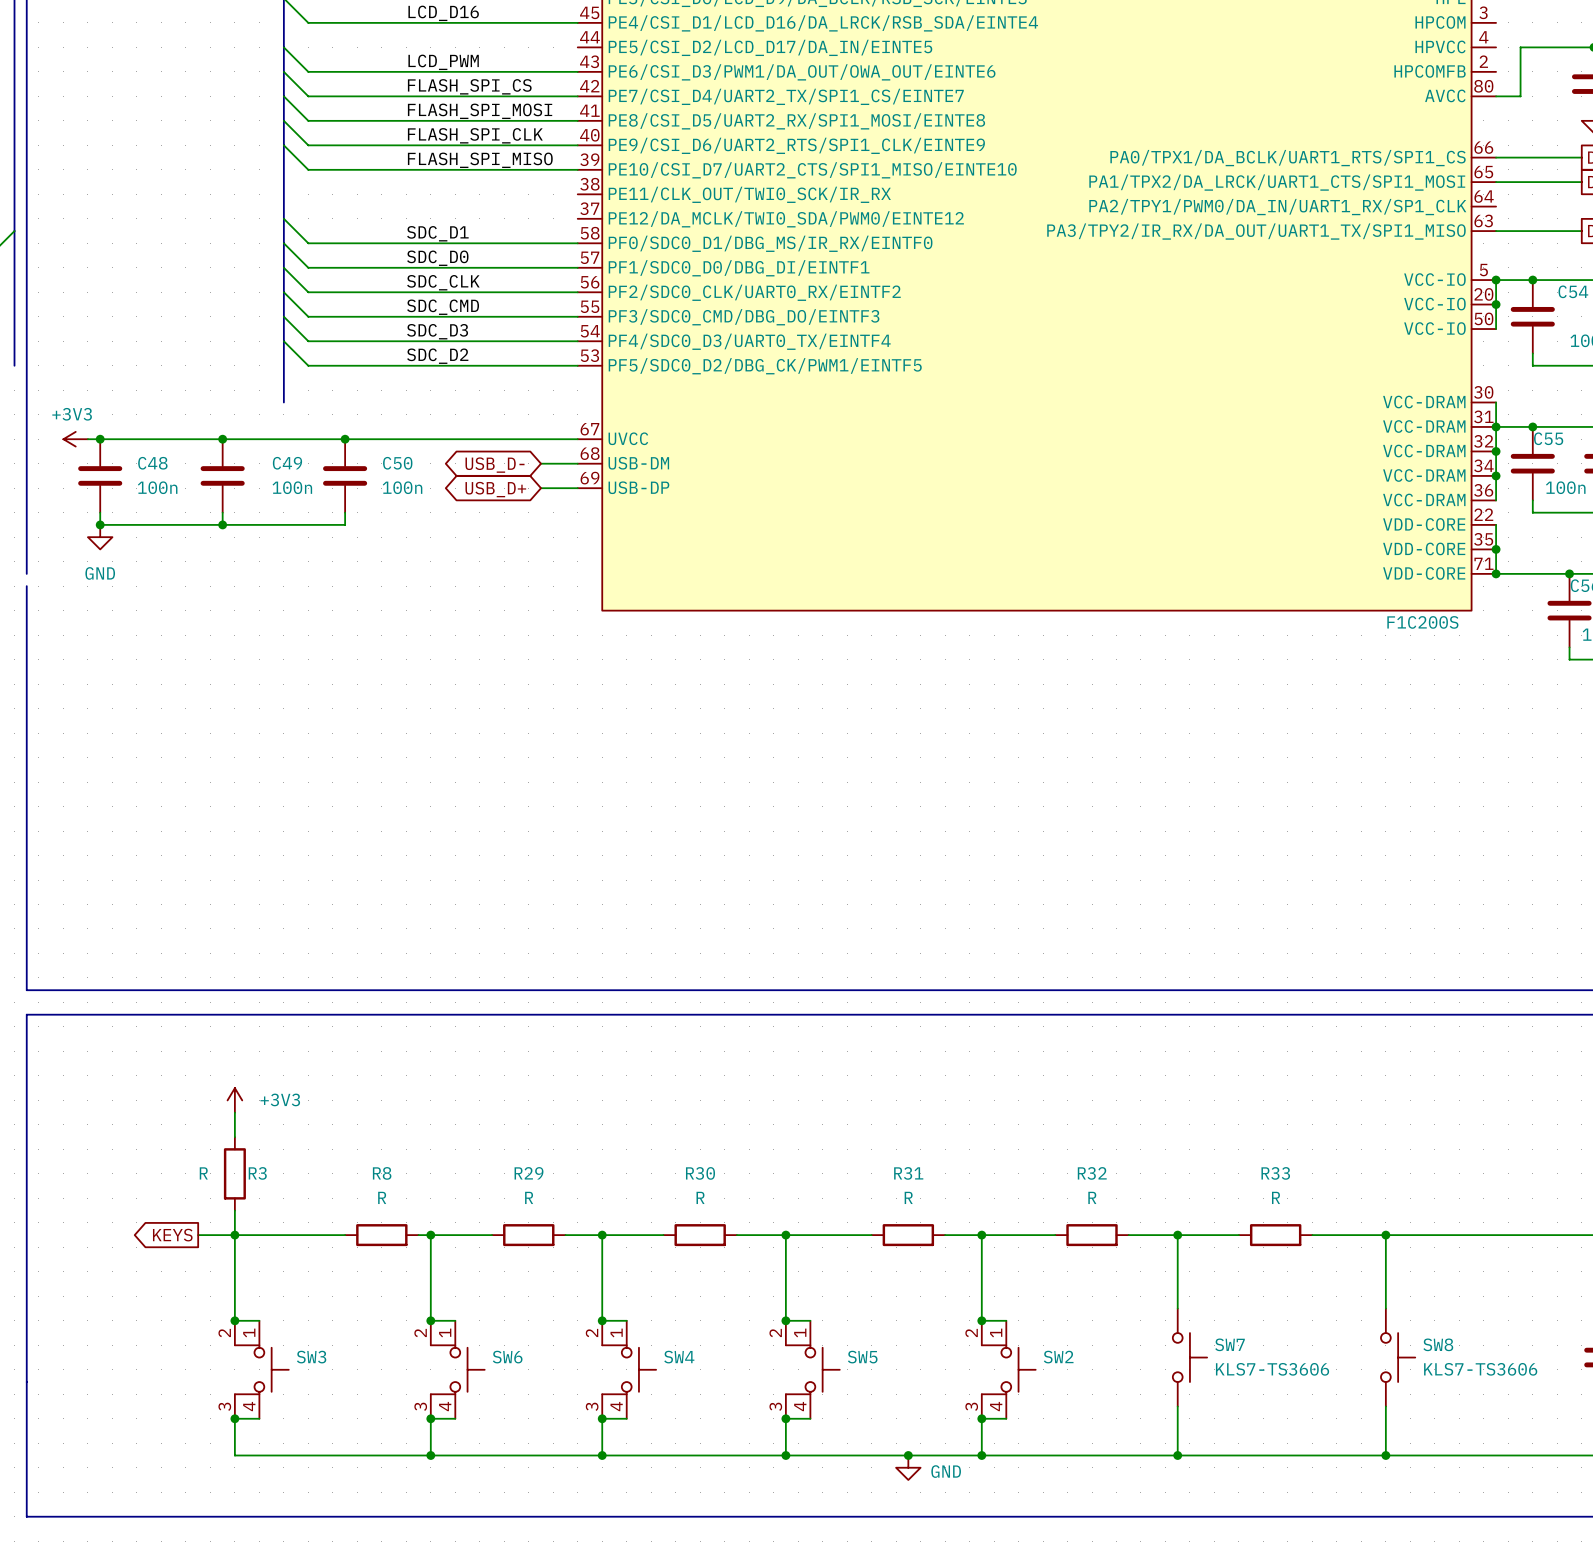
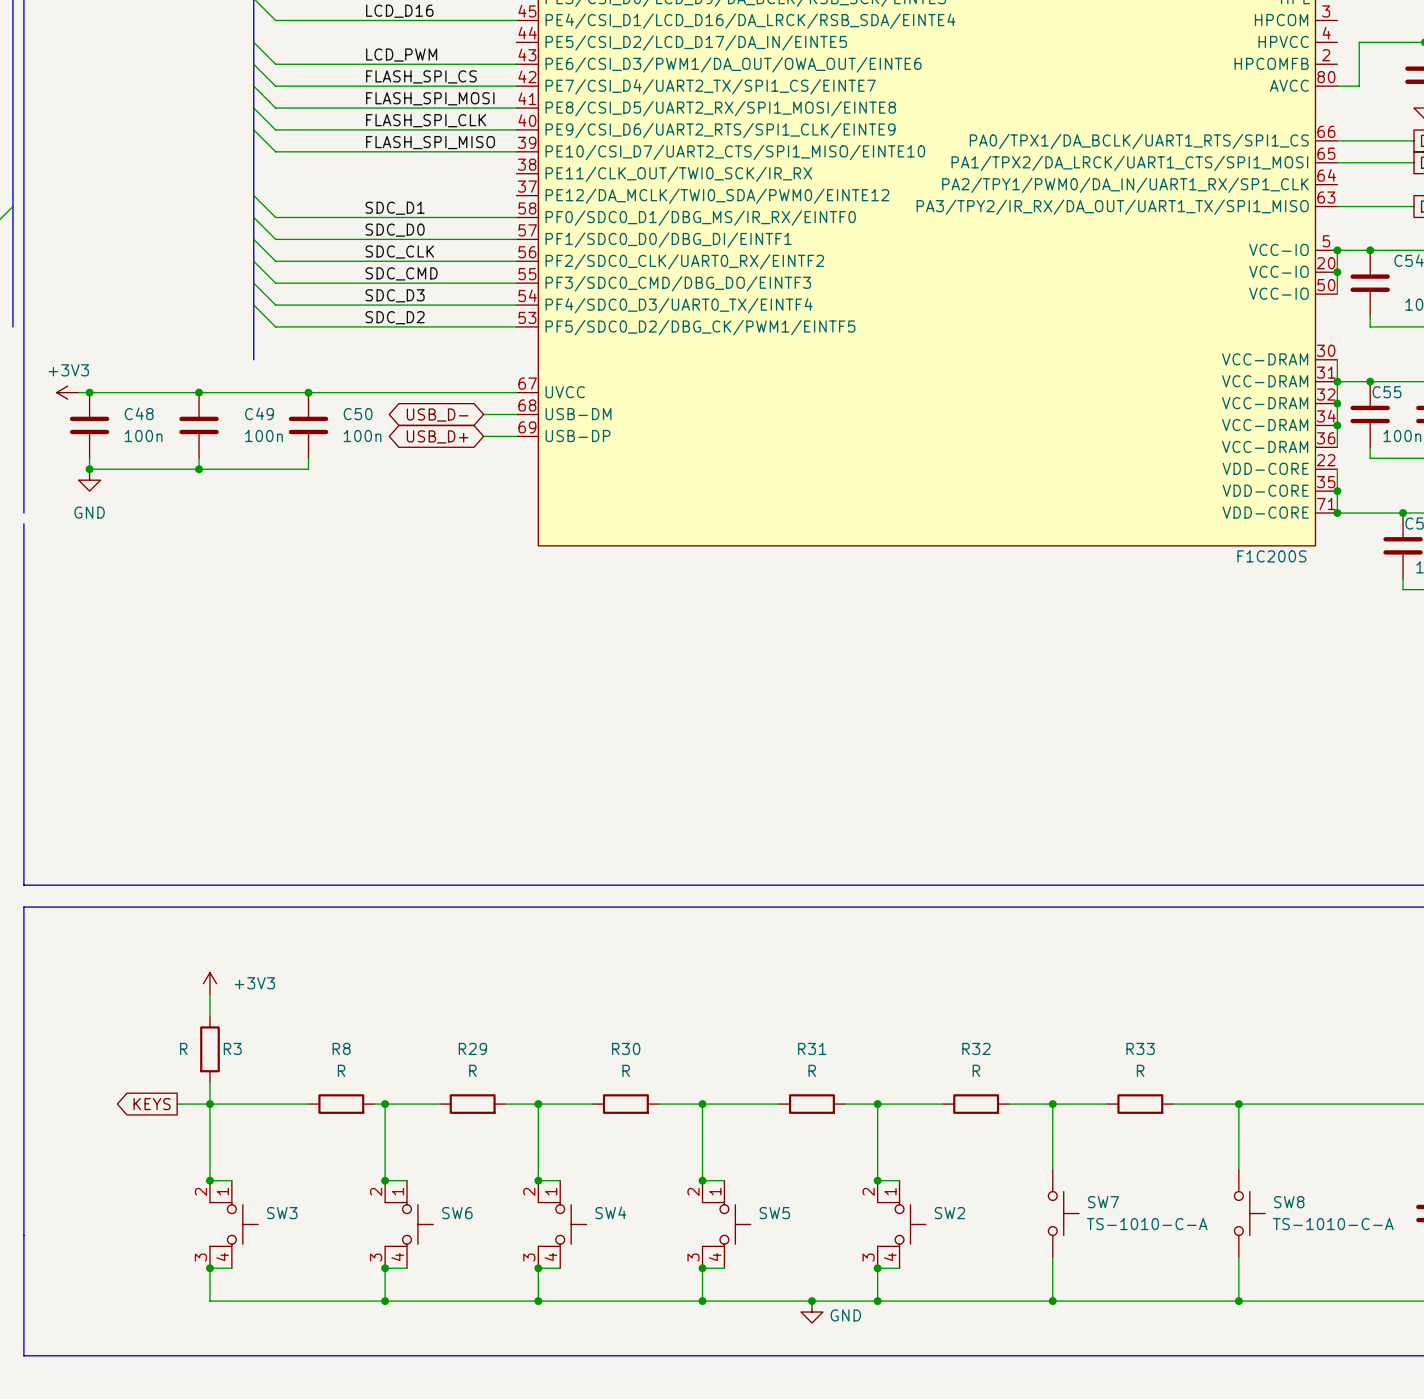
SW7 value: KLS7-TS3606 (1272, 1369) -> TS-1010-C-A (1147, 1224)
SW8 value: KLS7-TS3606 (1480, 1369) -> TS-1010-C-A (1333, 1224)

